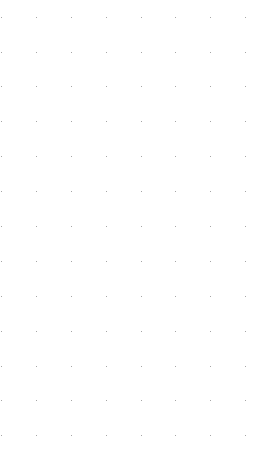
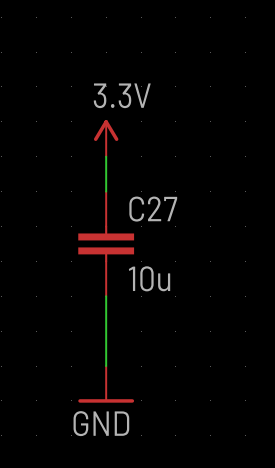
power symbol: none -> 3.3V (106, 138)
wire: none -> (106, 156) (106, 191)
C27: none -> 10u (106, 243)
wire: none -> (106, 296) (106, 366)
power symbol: none -> GND (106, 384)

